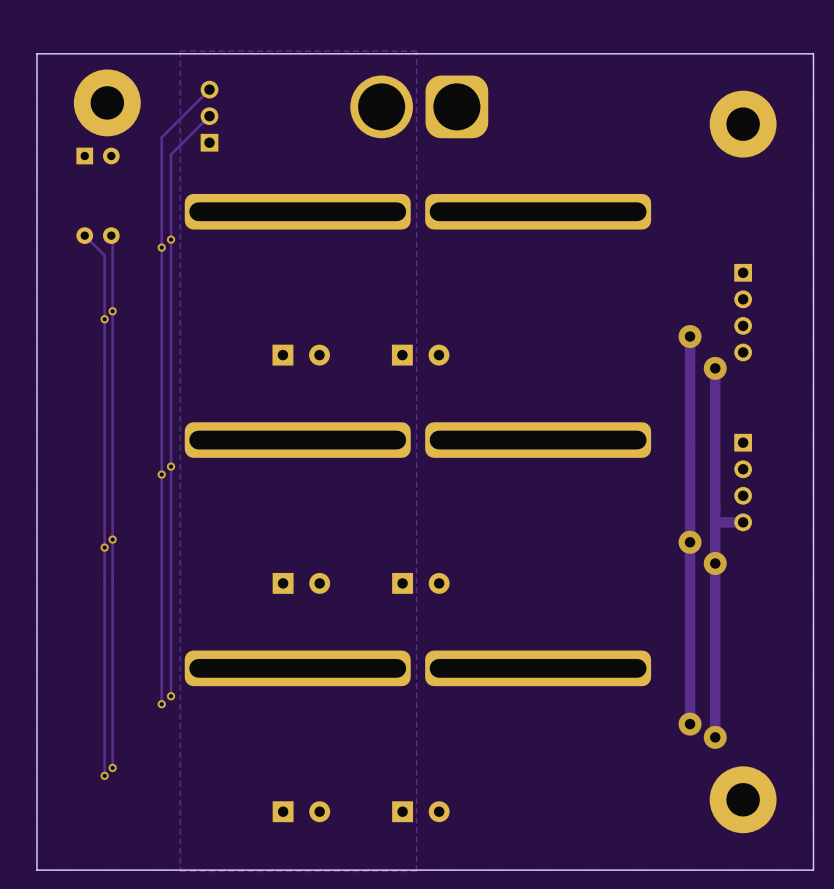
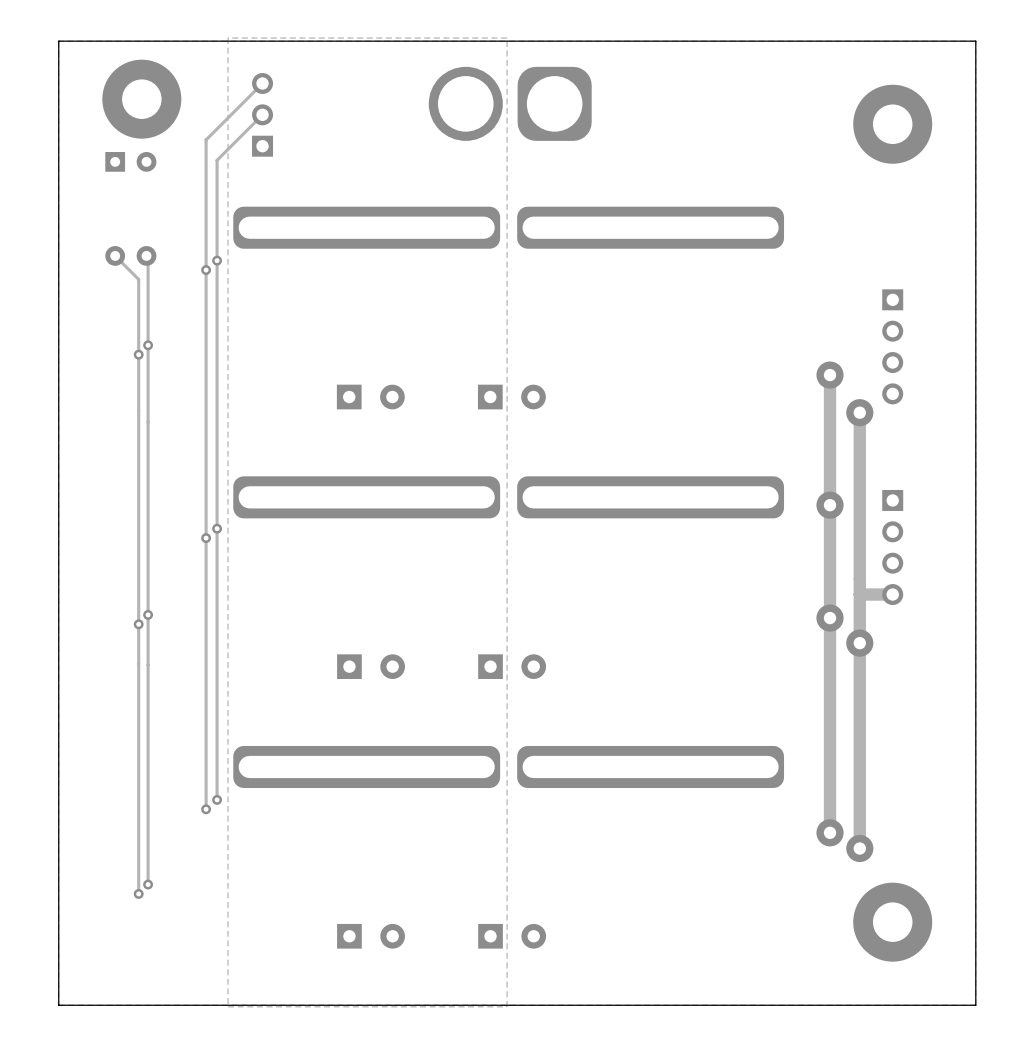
via: none -> (830, 505)

